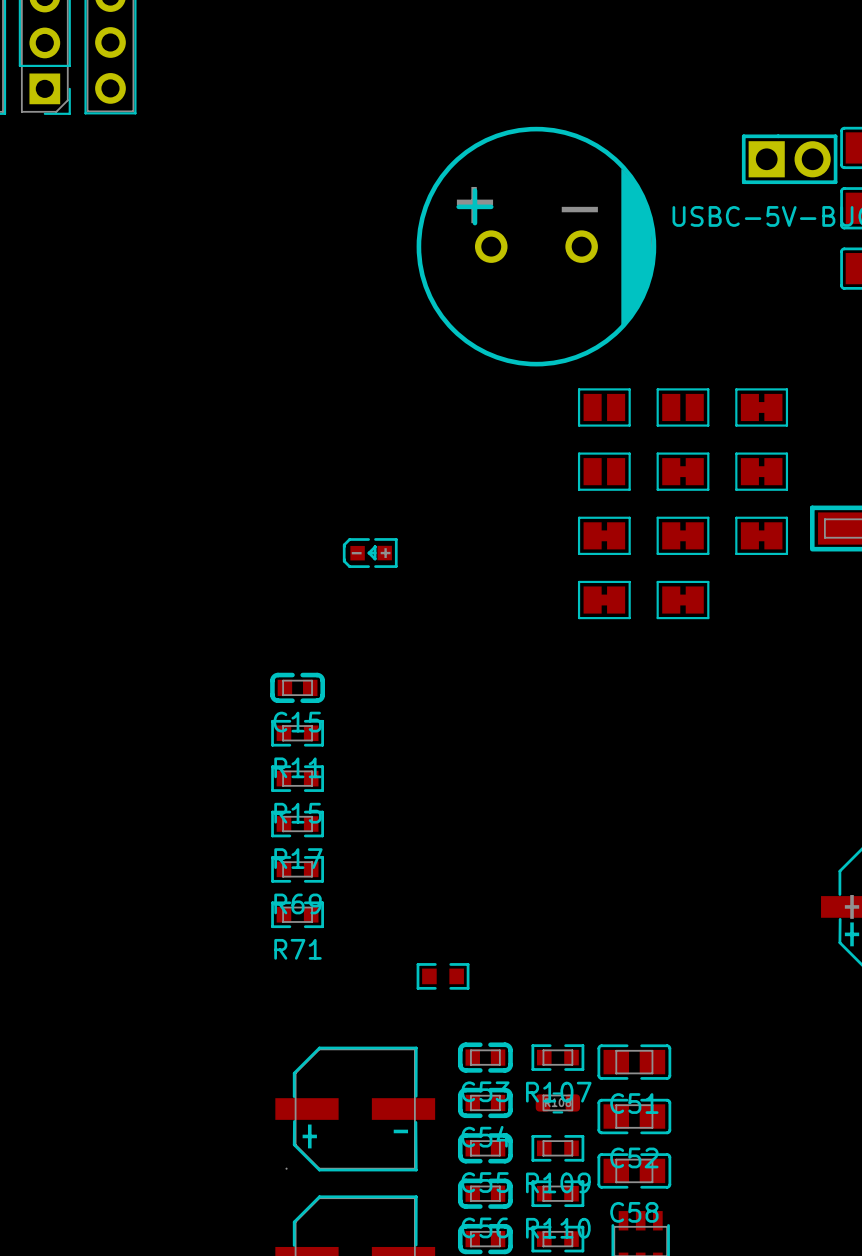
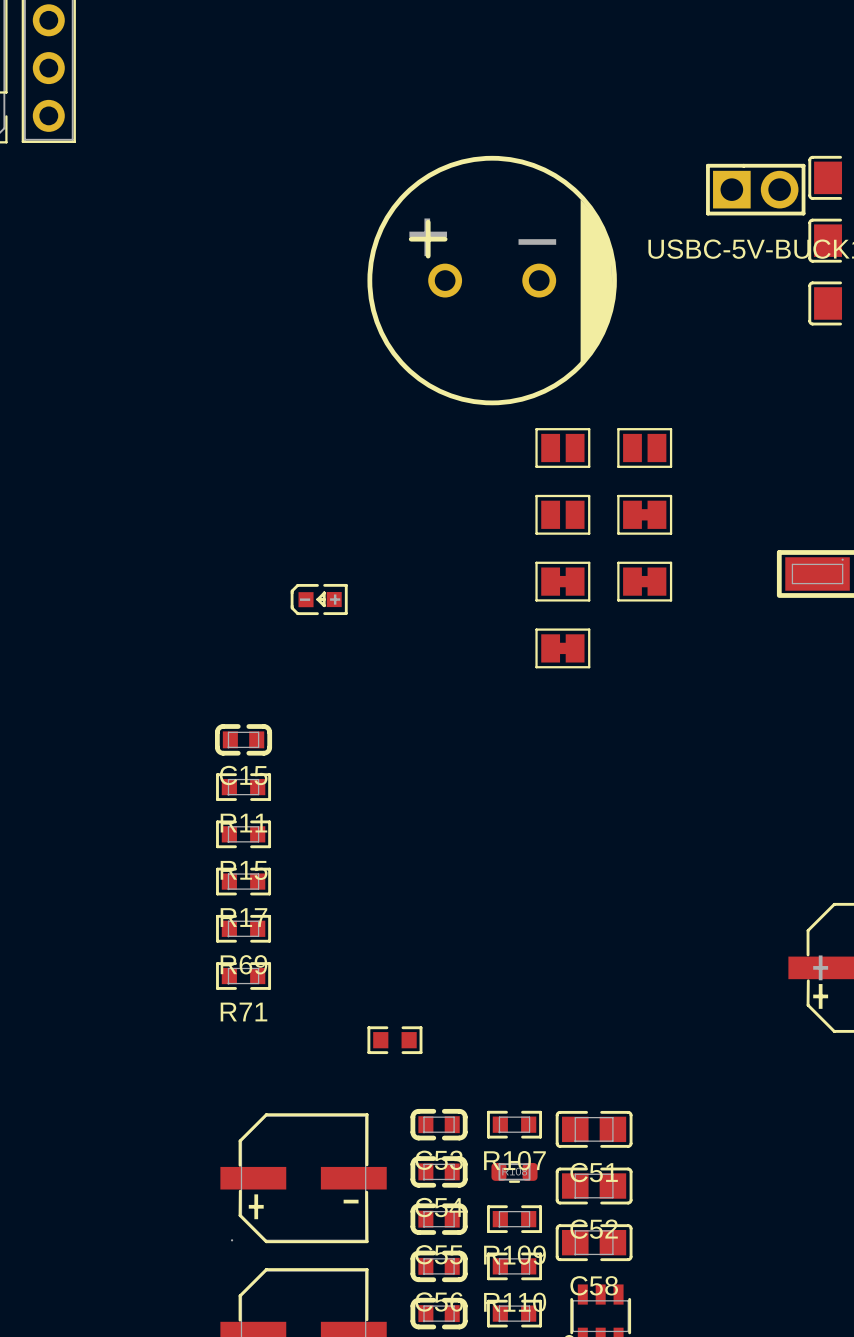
part: (761, 407) -> none
part: (761, 471) -> none
part: (761, 535) -> none
part: (683, 600) -> none

